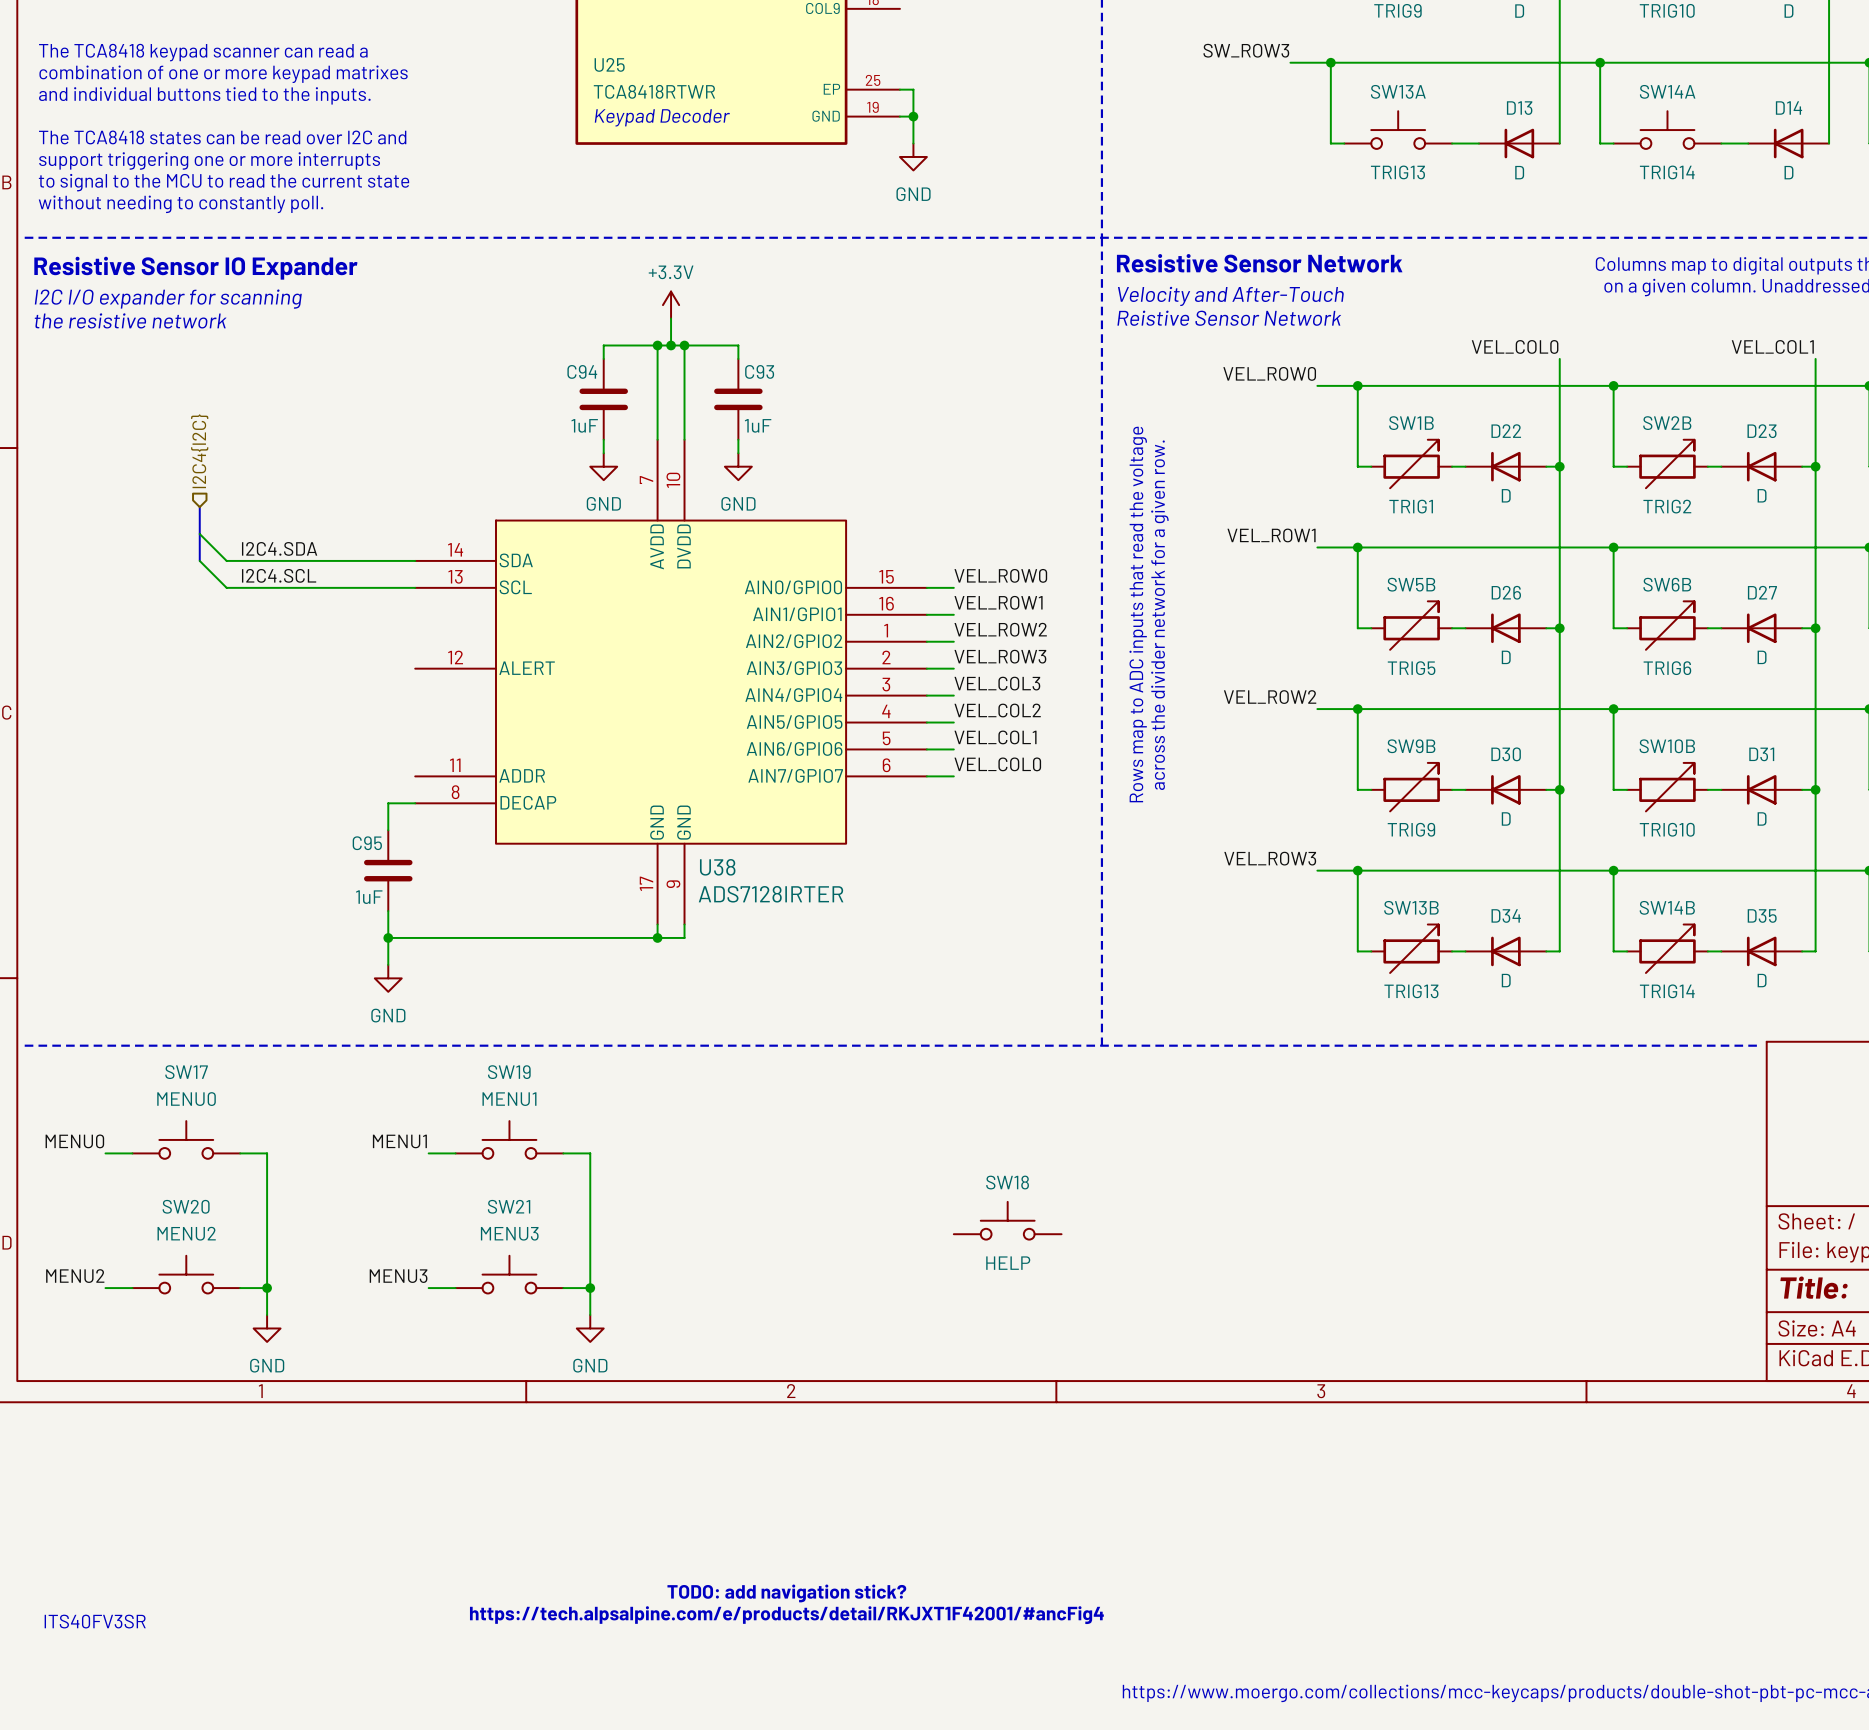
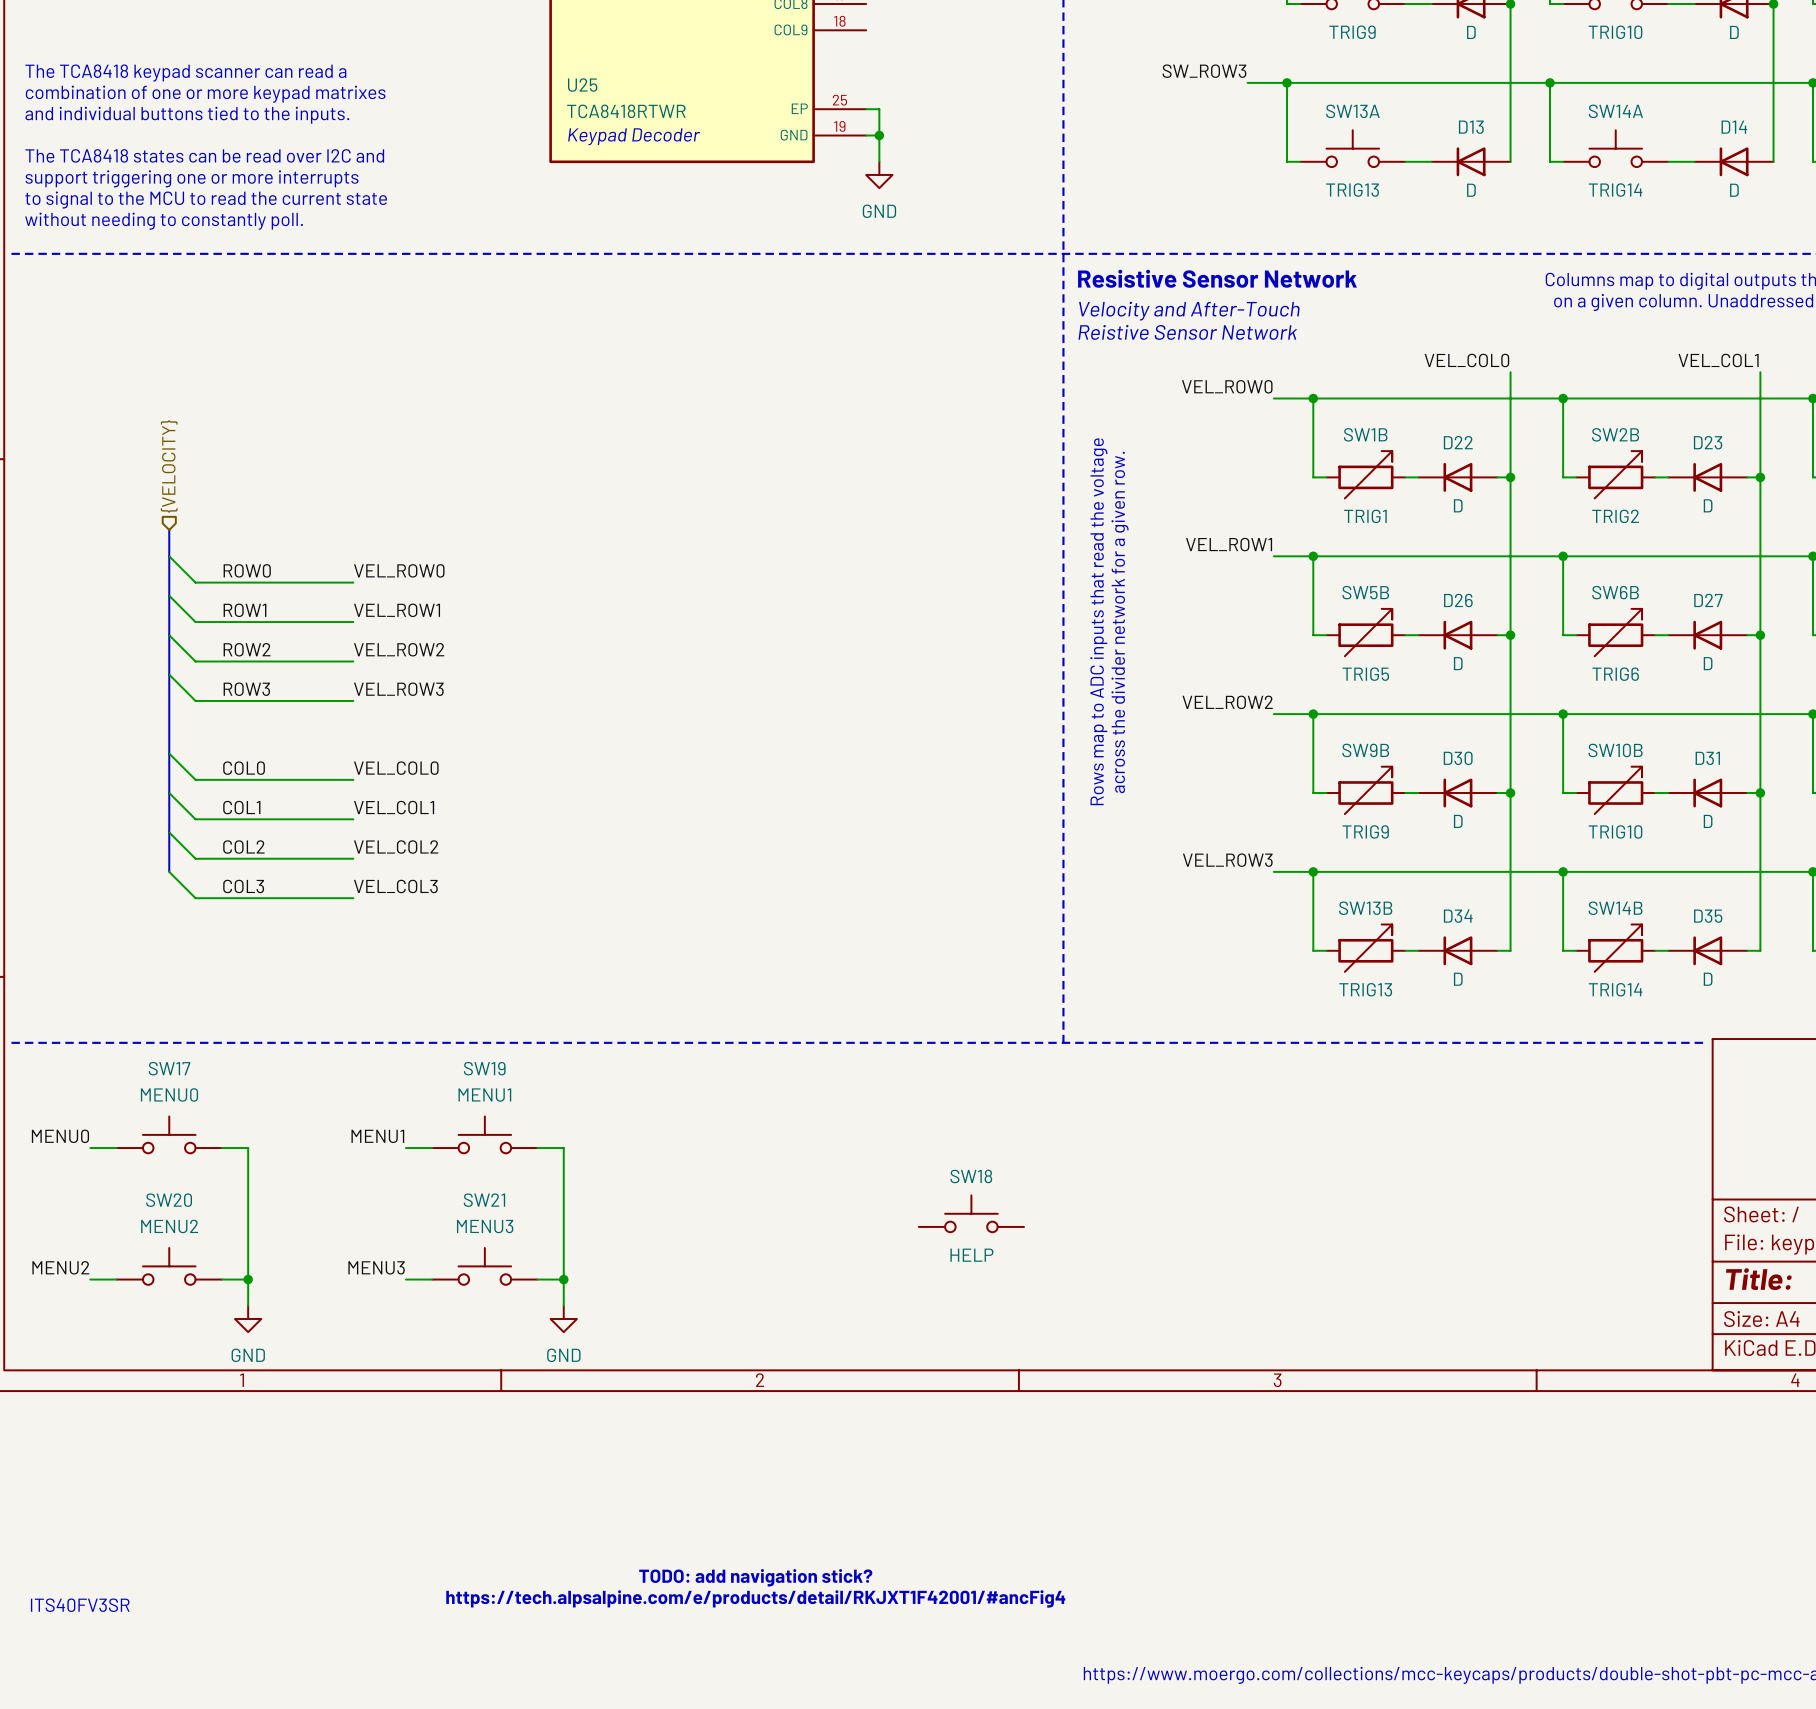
text: Resistive Sensor IO Expander (195, 268) -> none
text: I2C I/O expander for scanning (168, 299) -> none
power symbol: +3.3V (671, 305) -> none
wire: (671, 318) (671, 345) -> none
text: the resistive network (130, 320) -> none
wire: (657, 345) (657, 439) -> none
junction: (657, 345) -> none
junction: (671, 345) -> none
wire: (684, 345) (684, 439) -> none
junction: (684, 345) -> none
wire: (603, 358) (603, 345) (738, 345) (738, 358) -> none
C94: 1uF (603, 399) -> none
C93: 1uF (738, 399) -> none
wire: (603, 439) (603, 453) -> none
wire: (738, 439) (738, 453) -> none
hierarchical label: I2C4{I2C} (199, 451) -> none
hierarchical label: none -> {VELOCITY} (169, 466)
power symbol: GND (603, 466) -> none
power symbol: GND (738, 466) -> none
bus: (199, 507) (199, 560) -> none
bus: none -> (169, 530) (169, 871)
wire: (199, 534) (226, 560) (415, 560) -> none
wire: none -> (169, 556) (182, 569)
label: I2C4.SDA (279, 548) -> none
label: none -> ROW0 (247, 570)
label: none -> VEL_ROW0 (399, 570)
wire: (213, 574) (226, 587) (415, 587) -> (195, 582) (353, 582)
label: I2C4.SCL (279, 575) -> none
label: VEL_ROW0 (1000, 575) -> none
wire: none -> (169, 595) (195, 622) (353, 622)
wire: (926, 587) (953, 587) -> none
label: none -> ROW1 (244, 610)
label: none -> VEL_ROW1 (397, 610)
label: VEL_ROW1 (998, 602) -> none
wire: (926, 614) (953, 614) -> none
wire: none -> (169, 635) (195, 661) (353, 661)
label: VEL_ROW2 (1000, 629) -> none
wire: (926, 641) (953, 641) -> none
label: none -> ROW2 (247, 649)
label: none -> VEL_ROW2 (399, 649)
label: VEL_ROW3 (1000, 656) -> none
wire: none -> (169, 674) (195, 700) (353, 700)
wire: (926, 668) (953, 668) -> none
U38: ADS7128IRTER (671, 682) -> none
label: none -> ROW3 (246, 689)
label: none -> VEL_ROW3 (398, 689)
label: VEL_COL3 (997, 683) -> none
wire: (926, 695) (953, 695) -> none
label: VEL_COL2 (997, 710) -> none
wire: (926, 722) (953, 722) -> none
label: VEL_COL1 (995, 737) -> none
wire: none -> (169, 753) (195, 779) (353, 779)
wire: (926, 749) (953, 749) -> none
label: none -> COL0 (244, 768)
label: none -> VEL_COL0 (396, 768)
label: VEL_COL0 (997, 764) -> none
wire: (926, 776) (953, 776) -> none
wire: none -> (169, 793) (195, 819) (353, 819)
wire: (415, 803) (388, 803) (388, 830) -> none
label: none -> COL1 (241, 807)
label: none -> VEL_COL1 (394, 807)
wire: none -> (169, 832) (195, 858) (353, 858)
label: none -> COL2 (243, 847)
label: none -> VEL_COL2 (396, 847)
wire: none -> (169, 871) (195, 898) (353, 898)
C95: 1uF (388, 870) -> none
label: none -> COL3 (243, 886)
label: none -> VEL_COL3 (395, 886)
wire: (388, 911) (388, 964) -> none
wire: (657, 924) (657, 937) -> none
wire: (684, 924) (684, 937) (388, 937) -> none
junction: (388, 937) -> none
junction: (657, 937) -> none
power symbol: GND (388, 978) -> none

